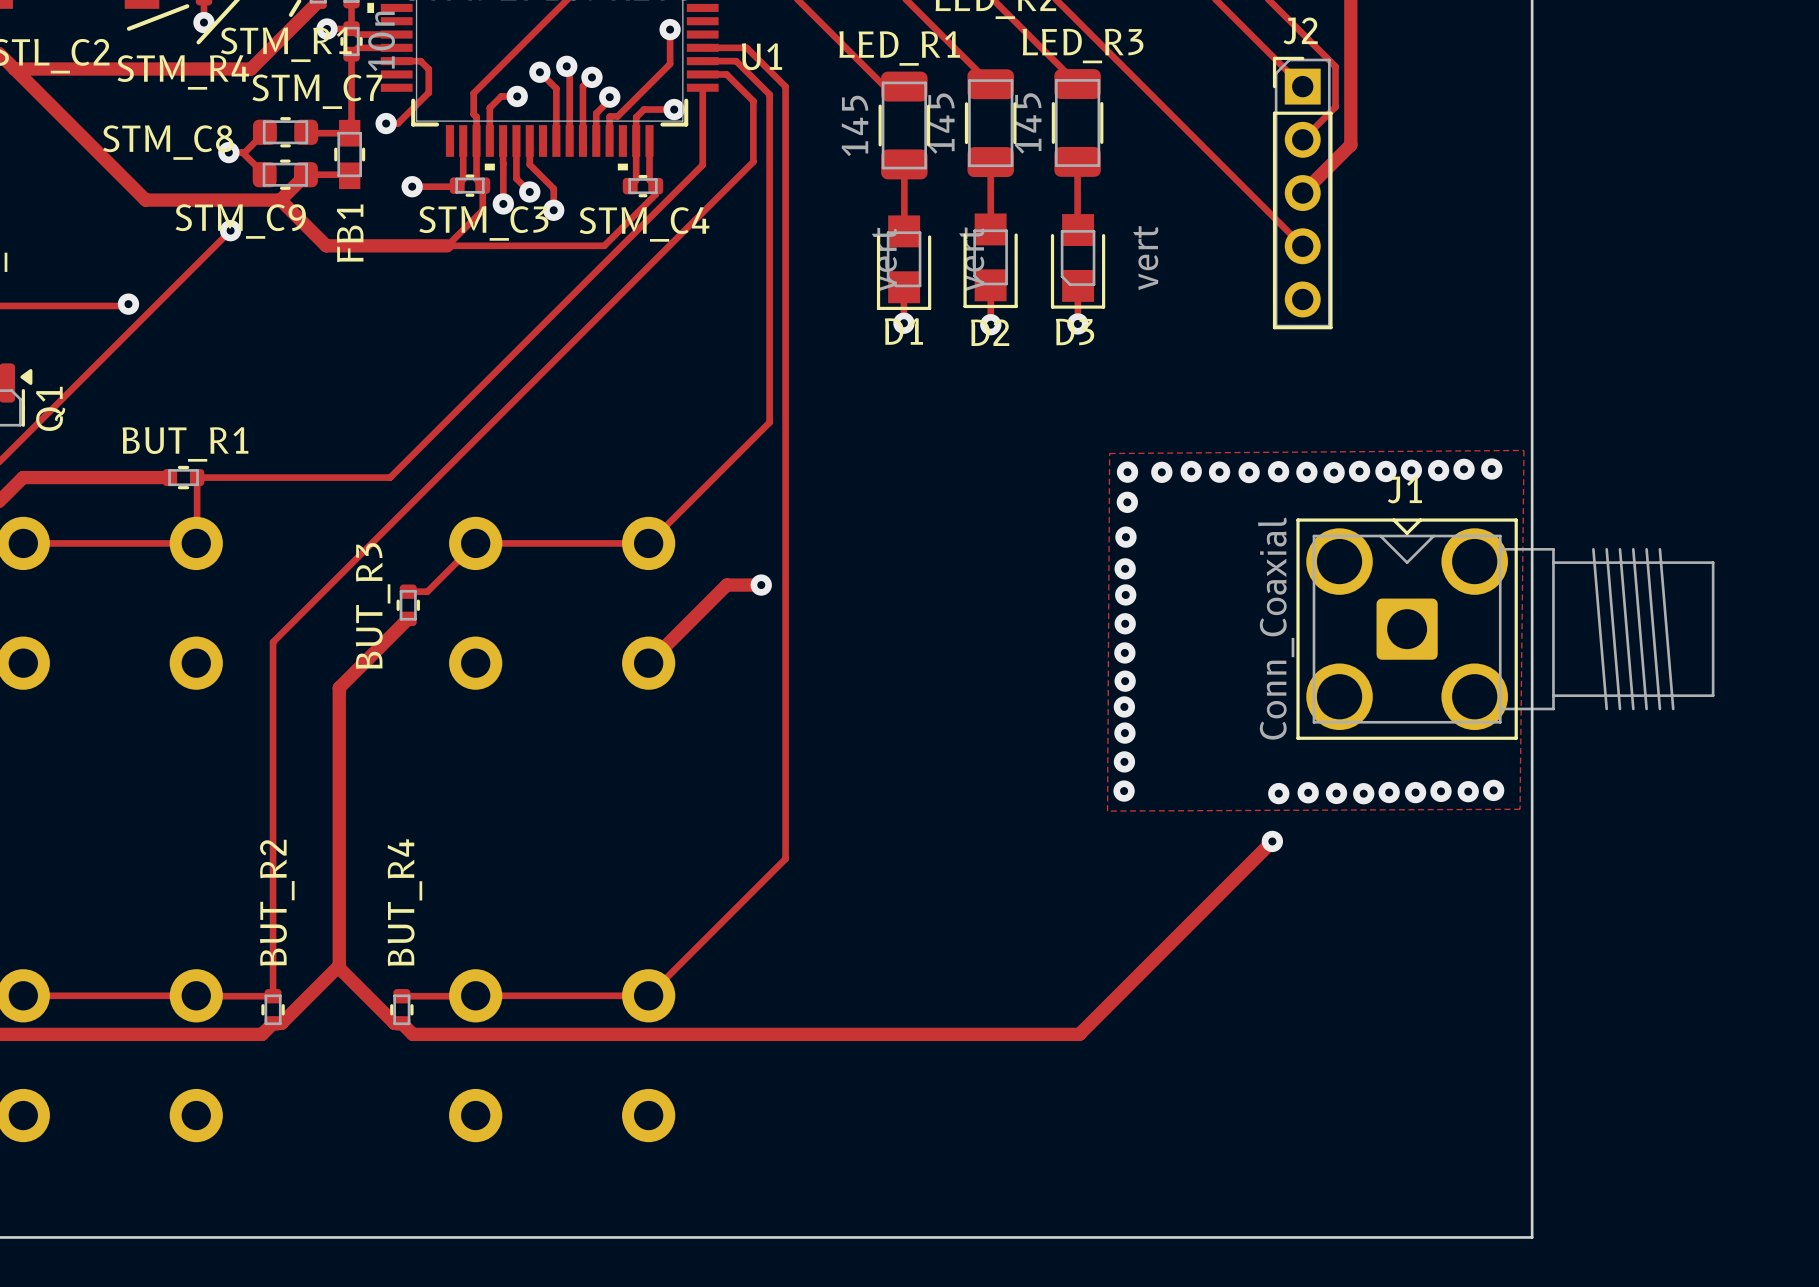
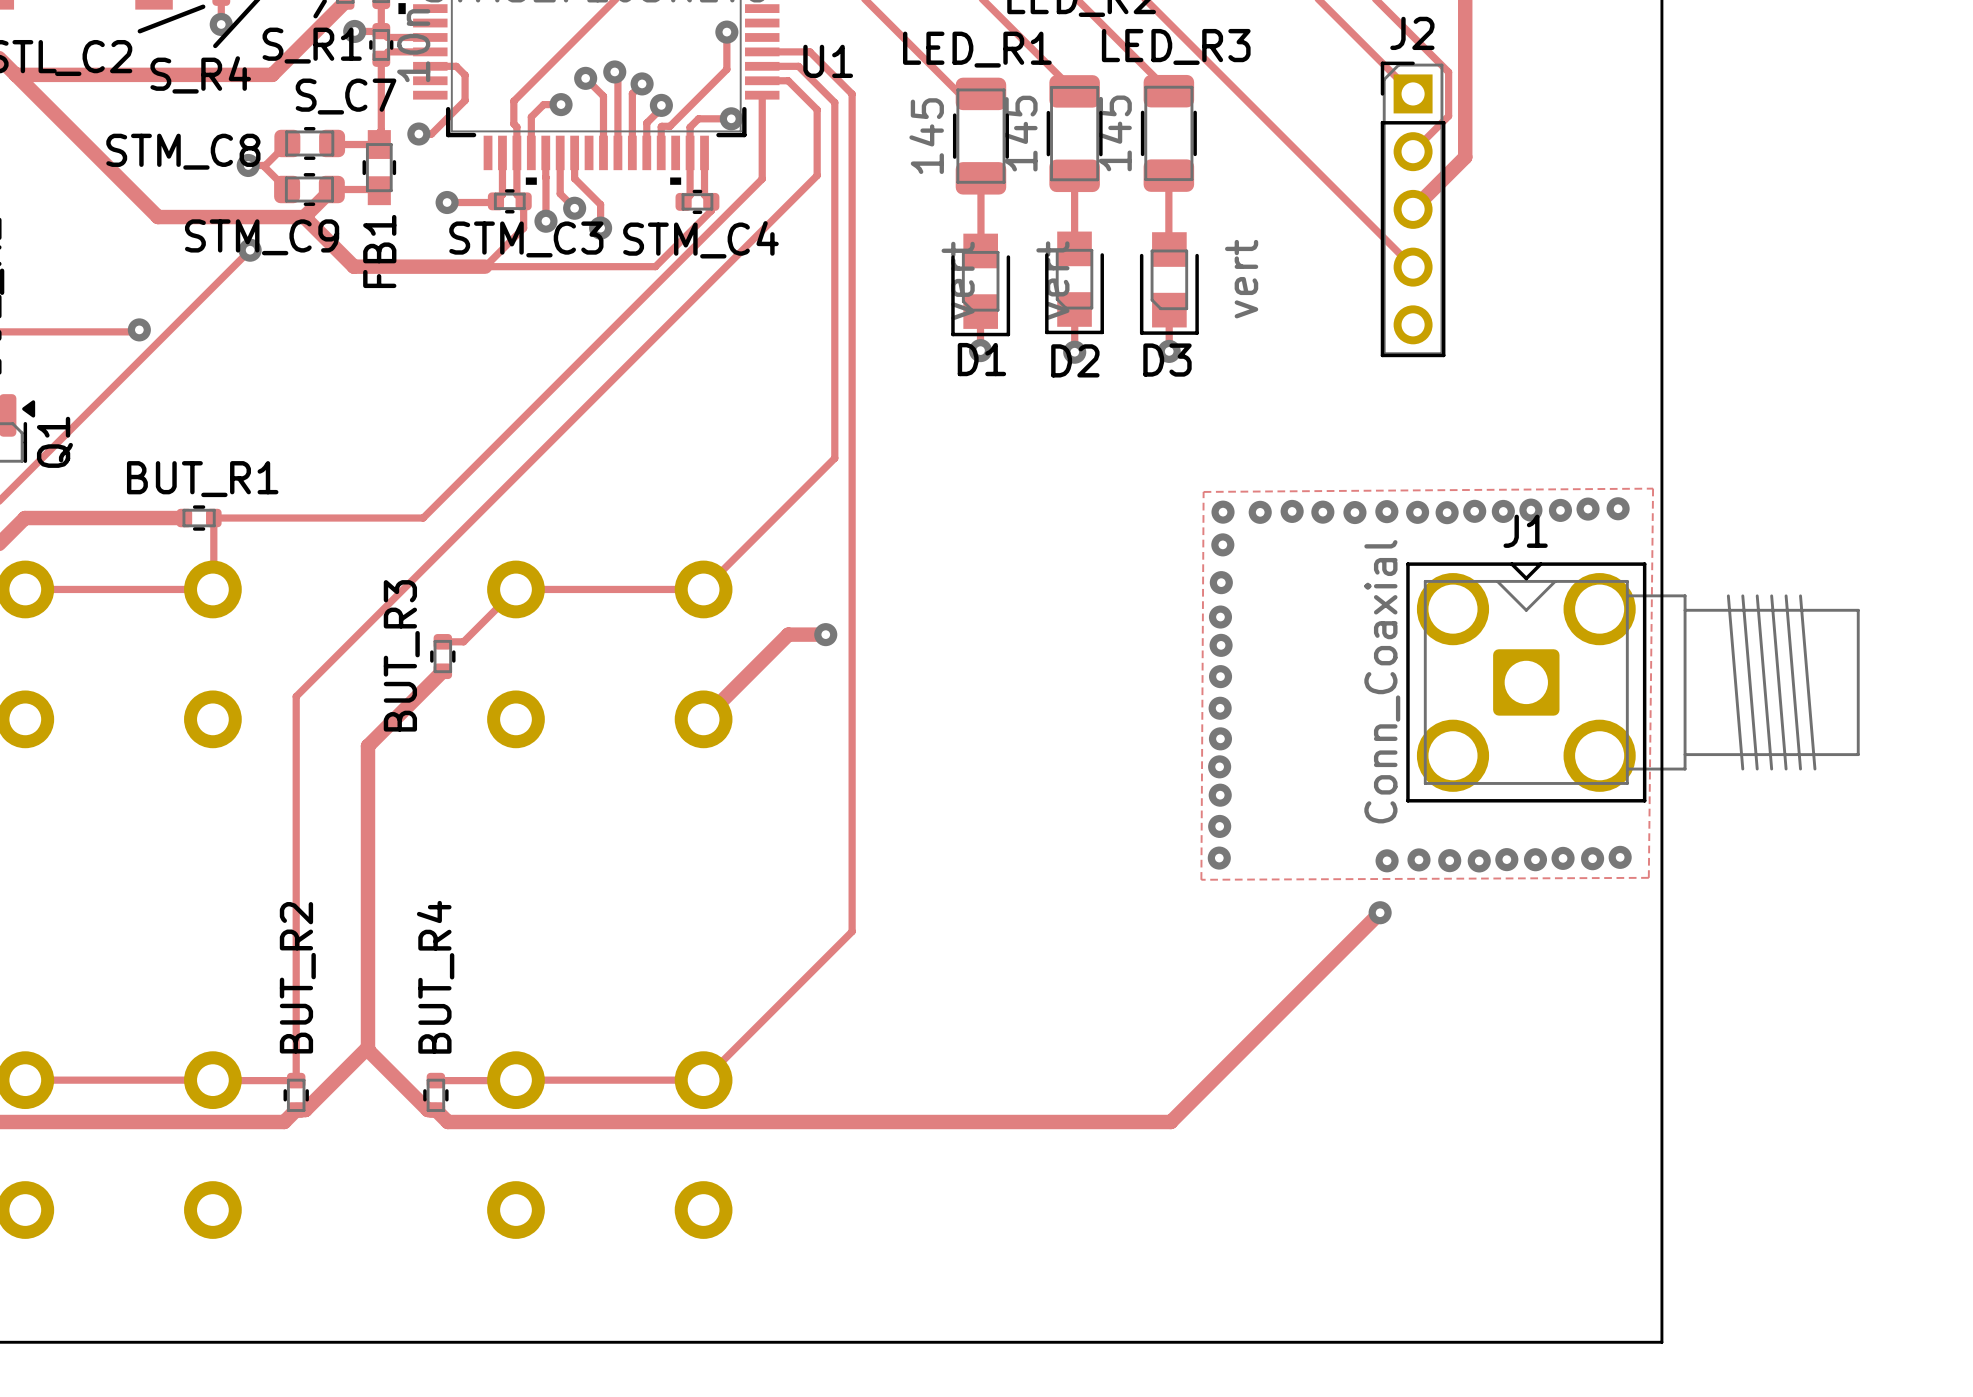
STM_R1 name: STM_R1 (286, 44) -> S_R1 (312, 45)
STM_R4 name: STM_R4 (183, 72) -> S_R4 (200, 74)
STM_C7 name: STM_C7 (317, 91) -> S_C7 (346, 96)

